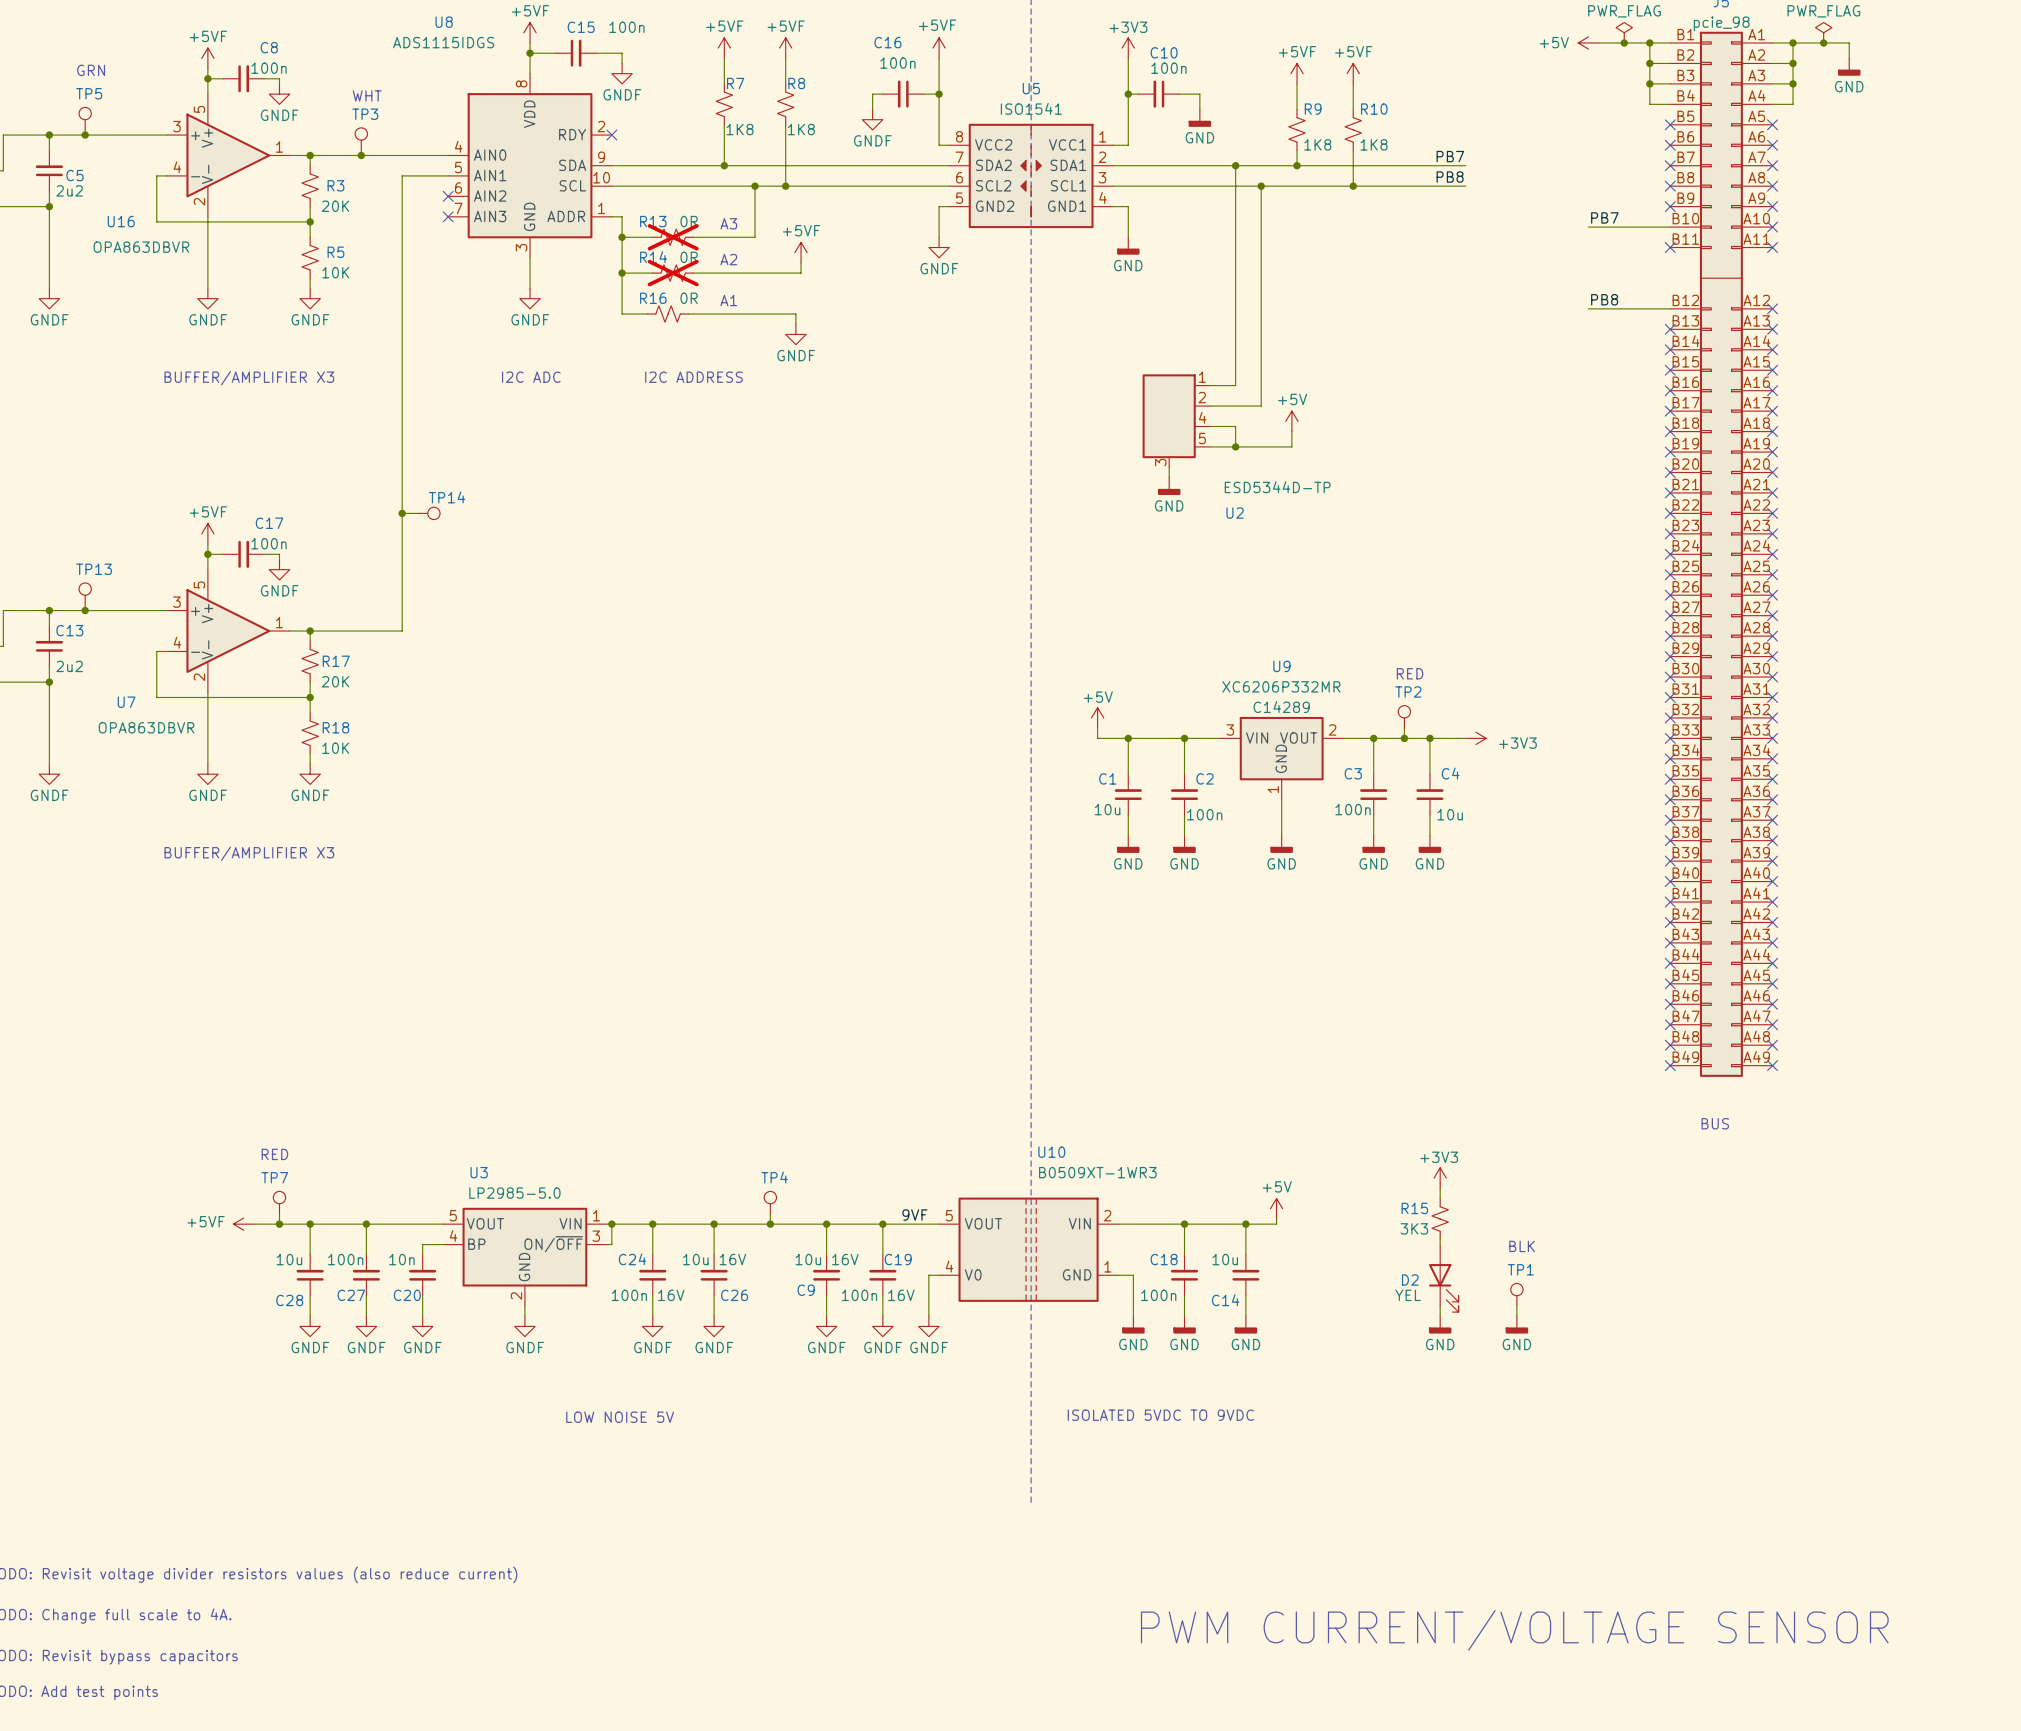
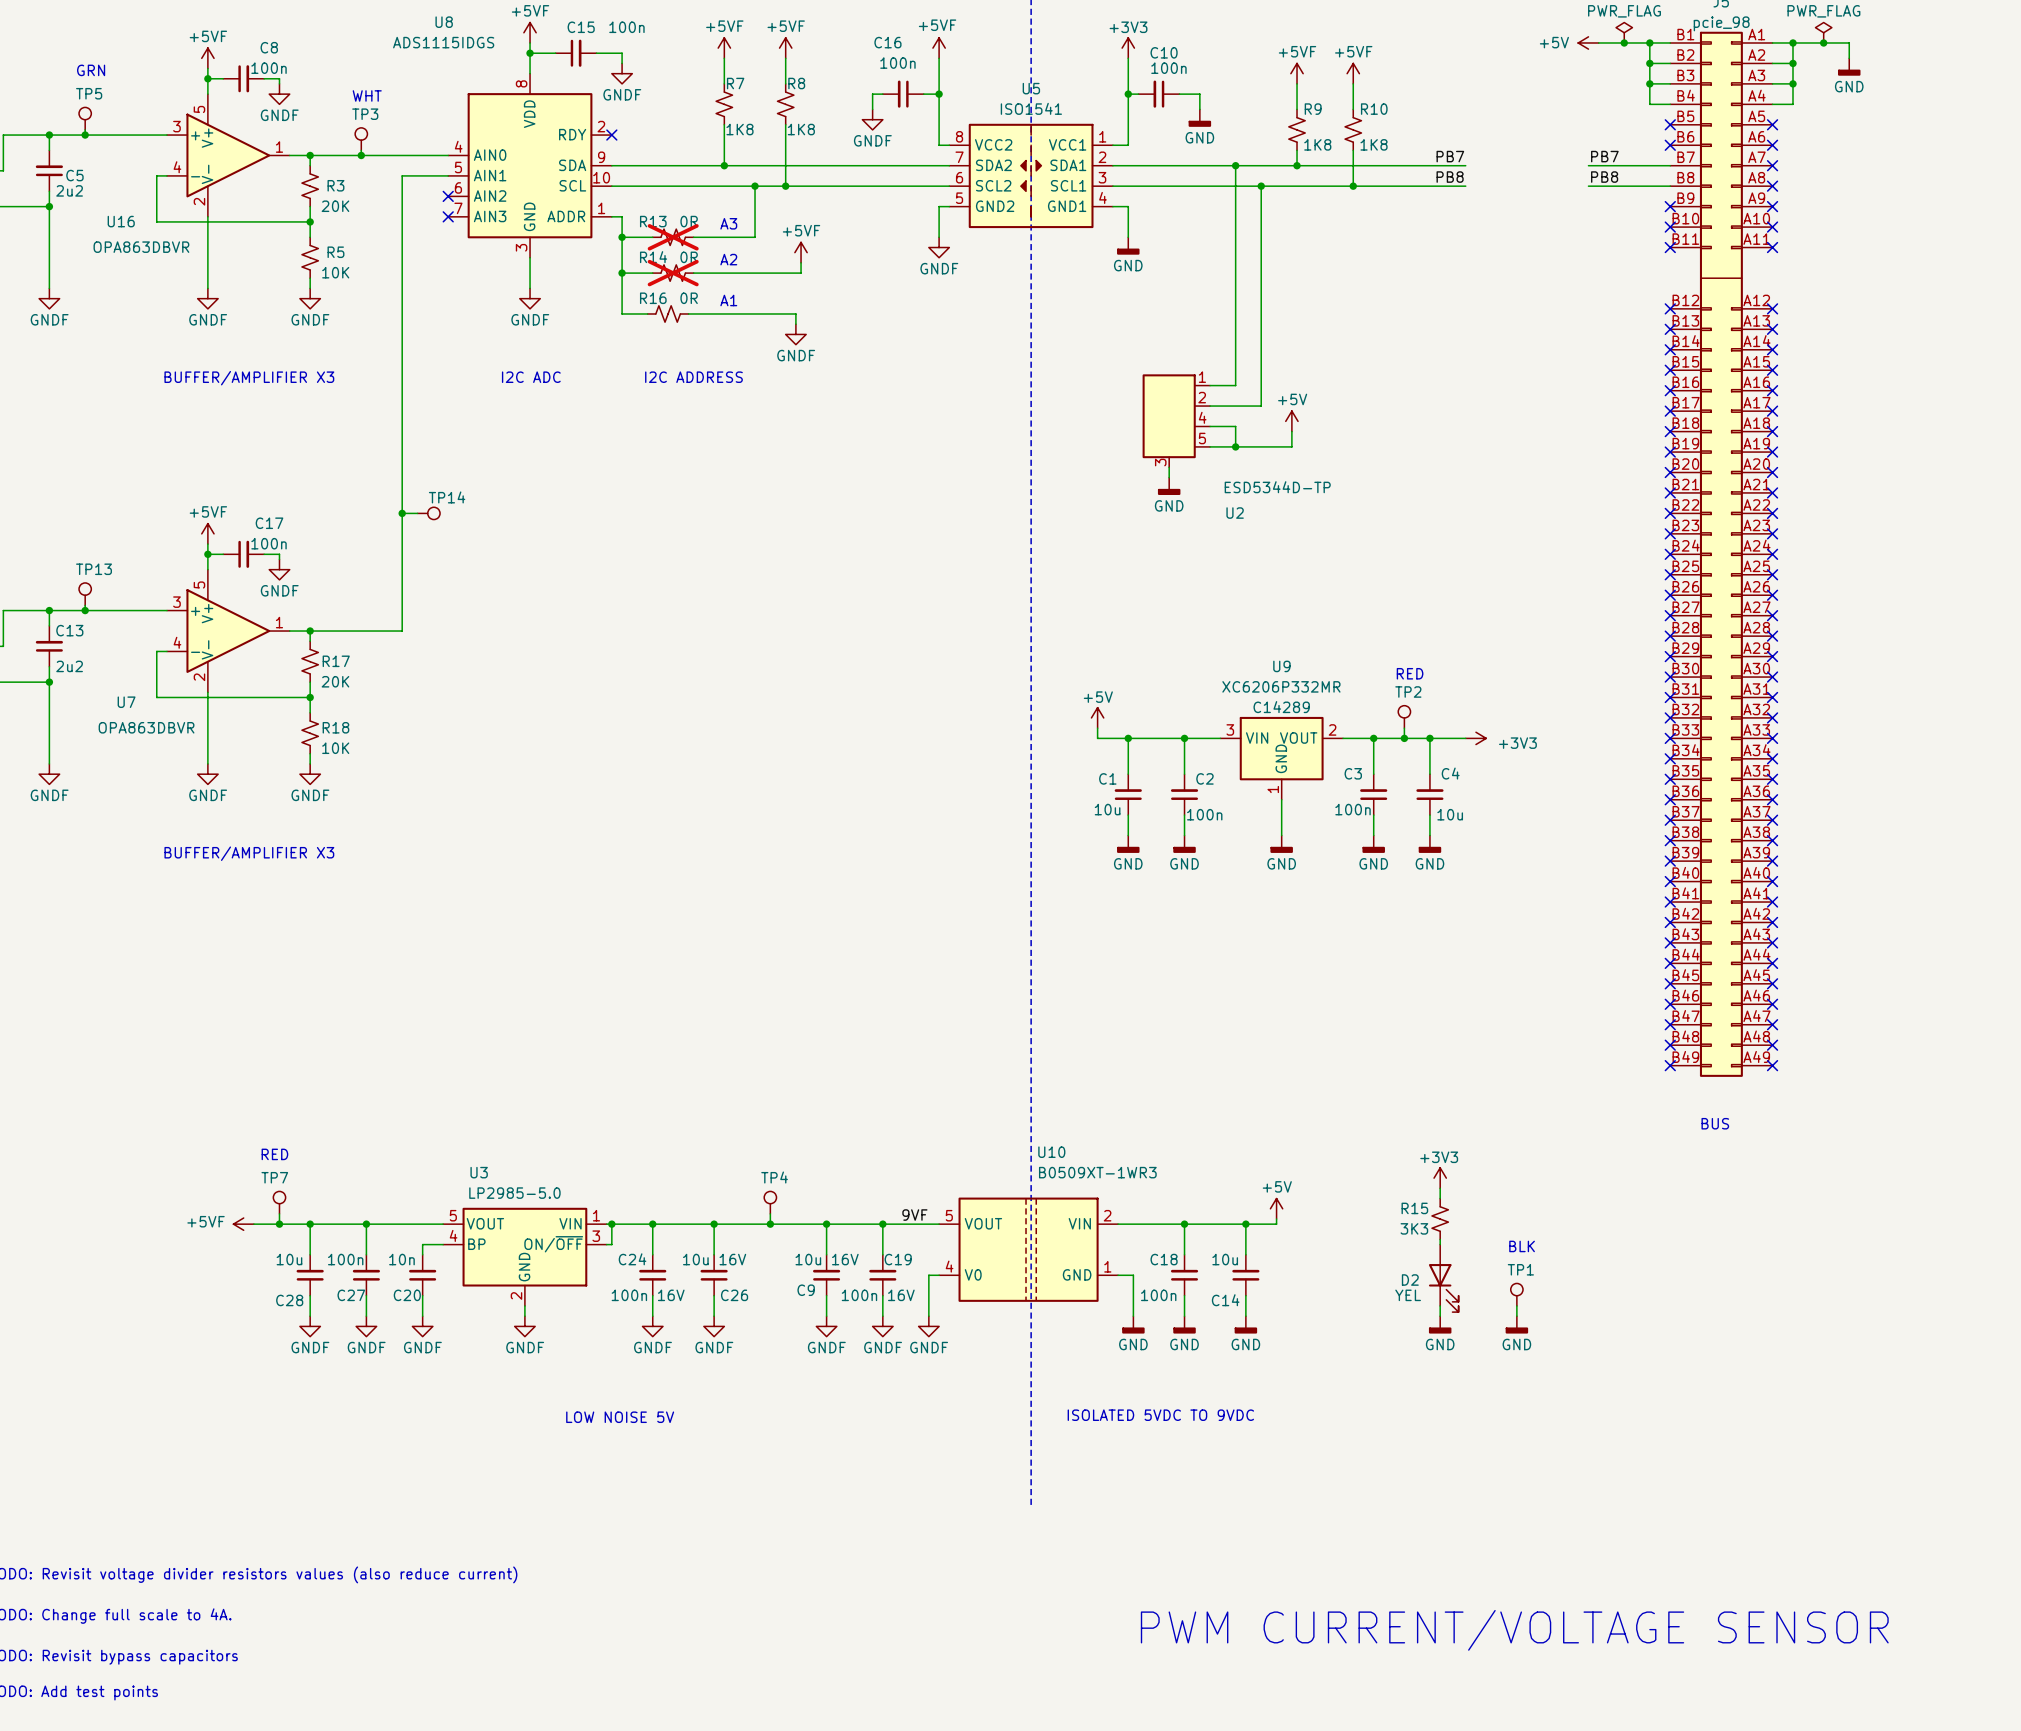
no-connect mark: (1670, 165) -> none
no-connect mark: (1670, 186) -> none
label position: PB7 (1604, 217) -> PB7 (1604, 156)
wire: (1588, 227) (1670, 227) -> (1588, 186) (1670, 186)
no-connect mark: none -> (1670, 227)
label position: PB8 (1604, 299) -> PB8 (1604, 177)
wire: (1588, 308) (1670, 308) -> (1588, 165) (1670, 165)
no-connect mark: none -> (1670, 308)

